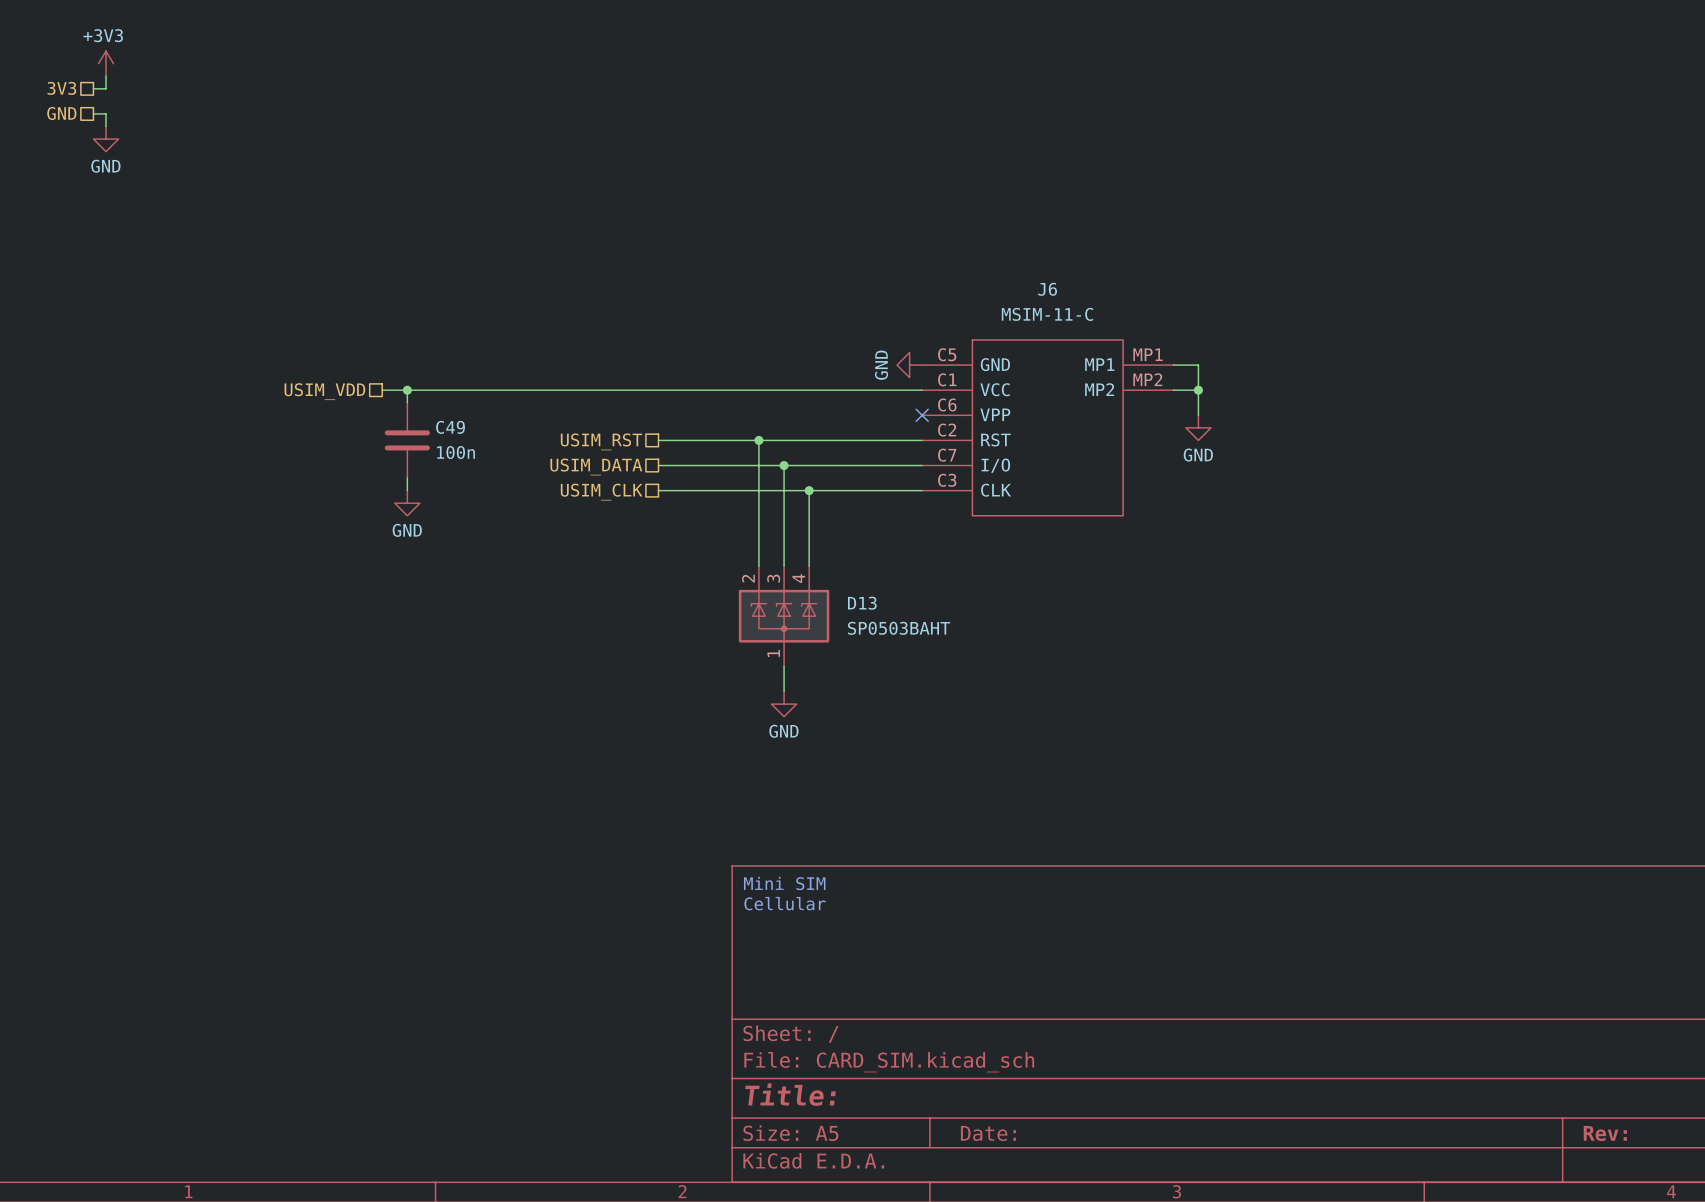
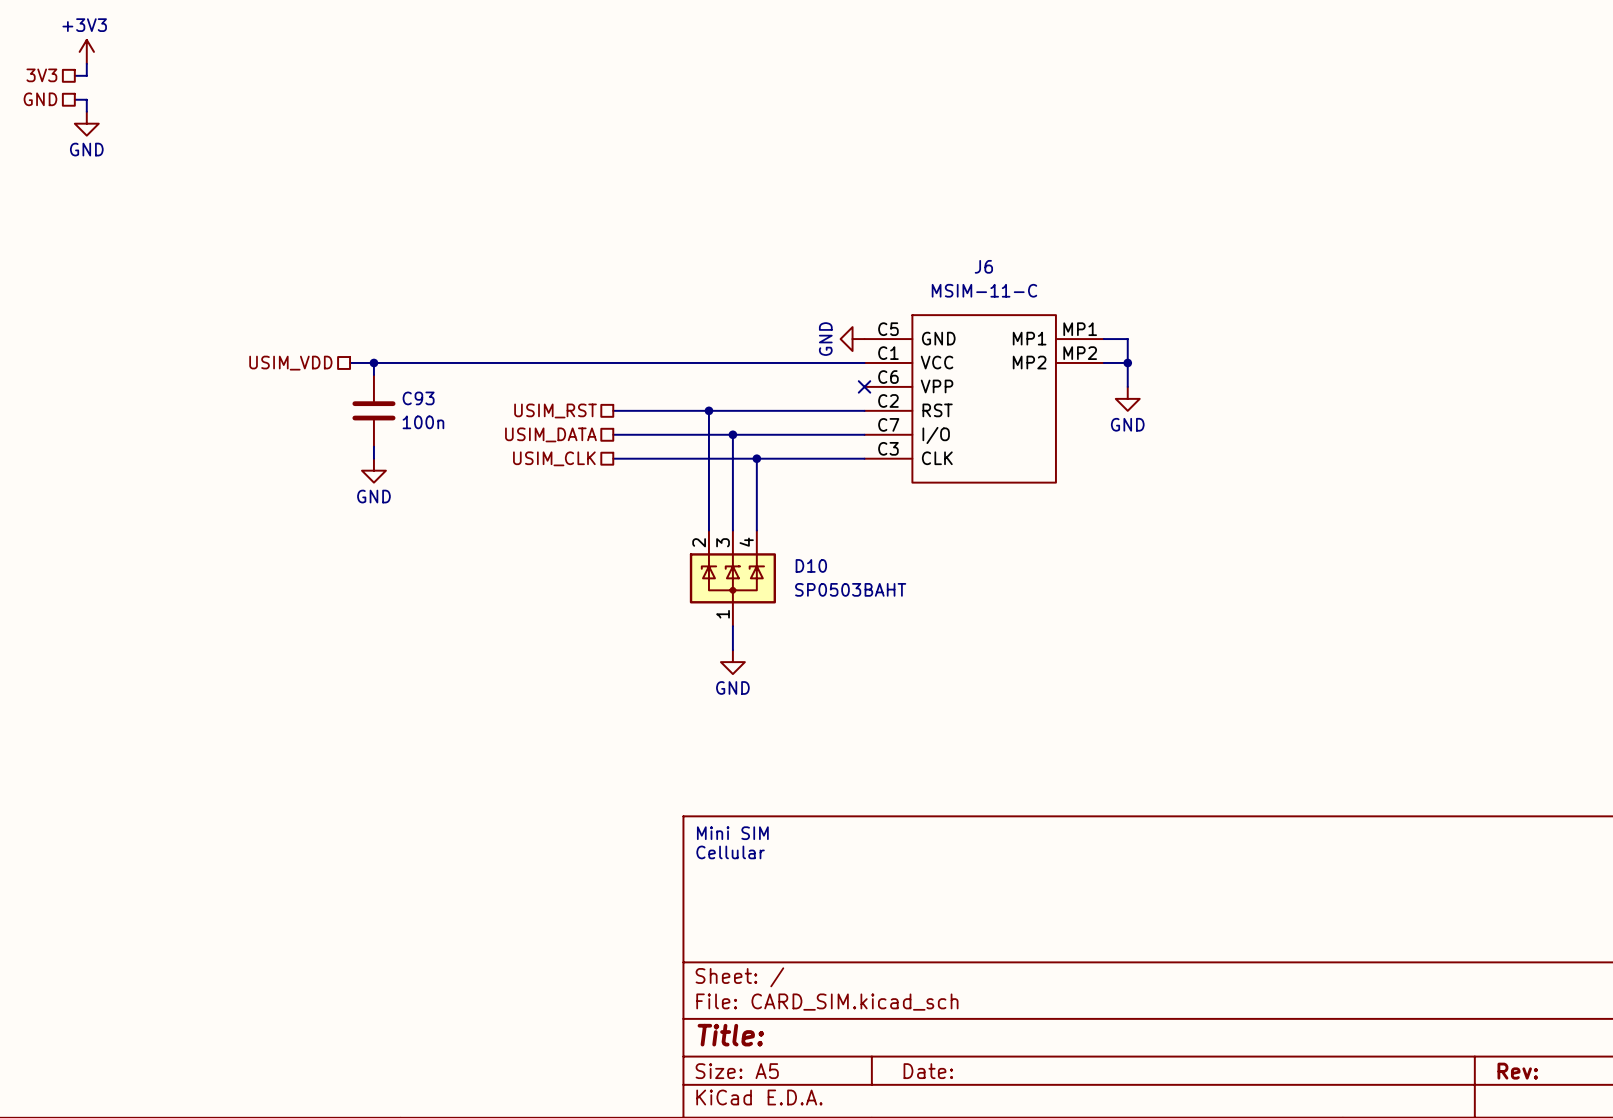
C49 name: C49 (450, 427) -> C93 (418, 398)
D13 name: D13 (862, 603) -> D10 (811, 565)

